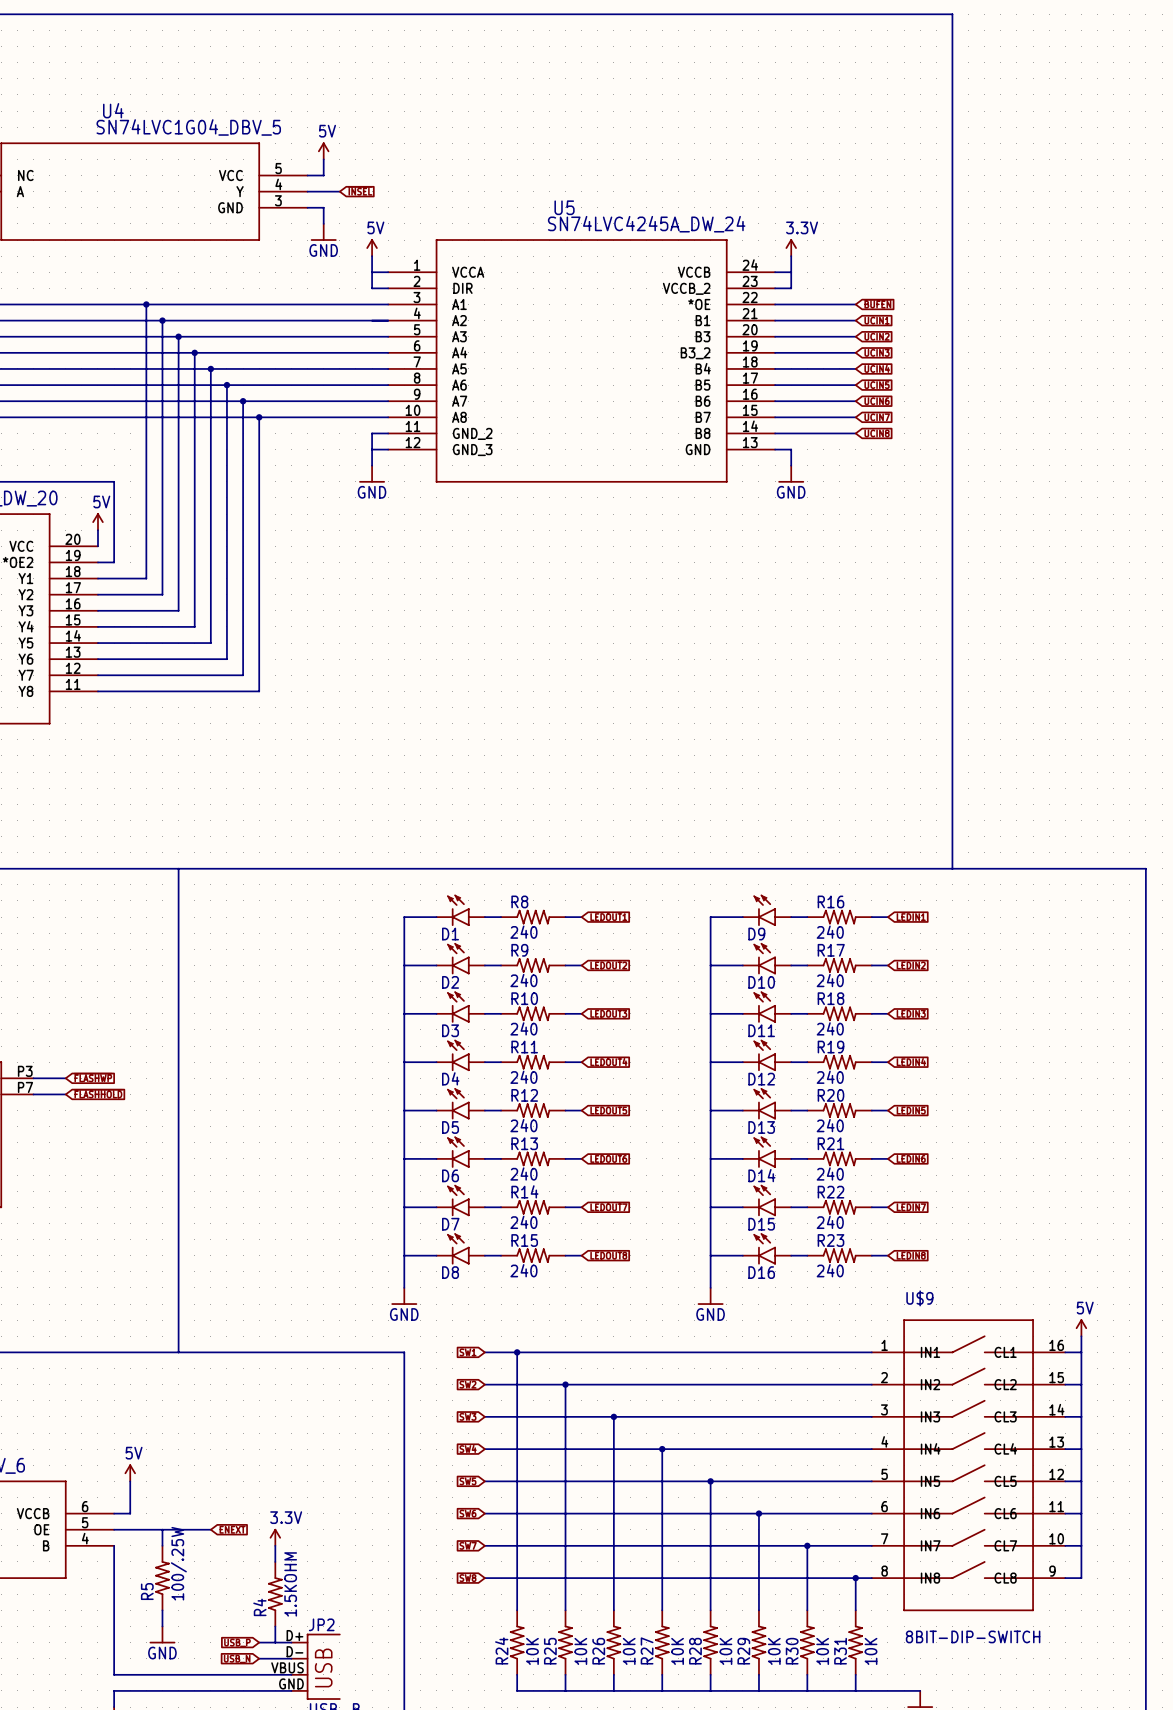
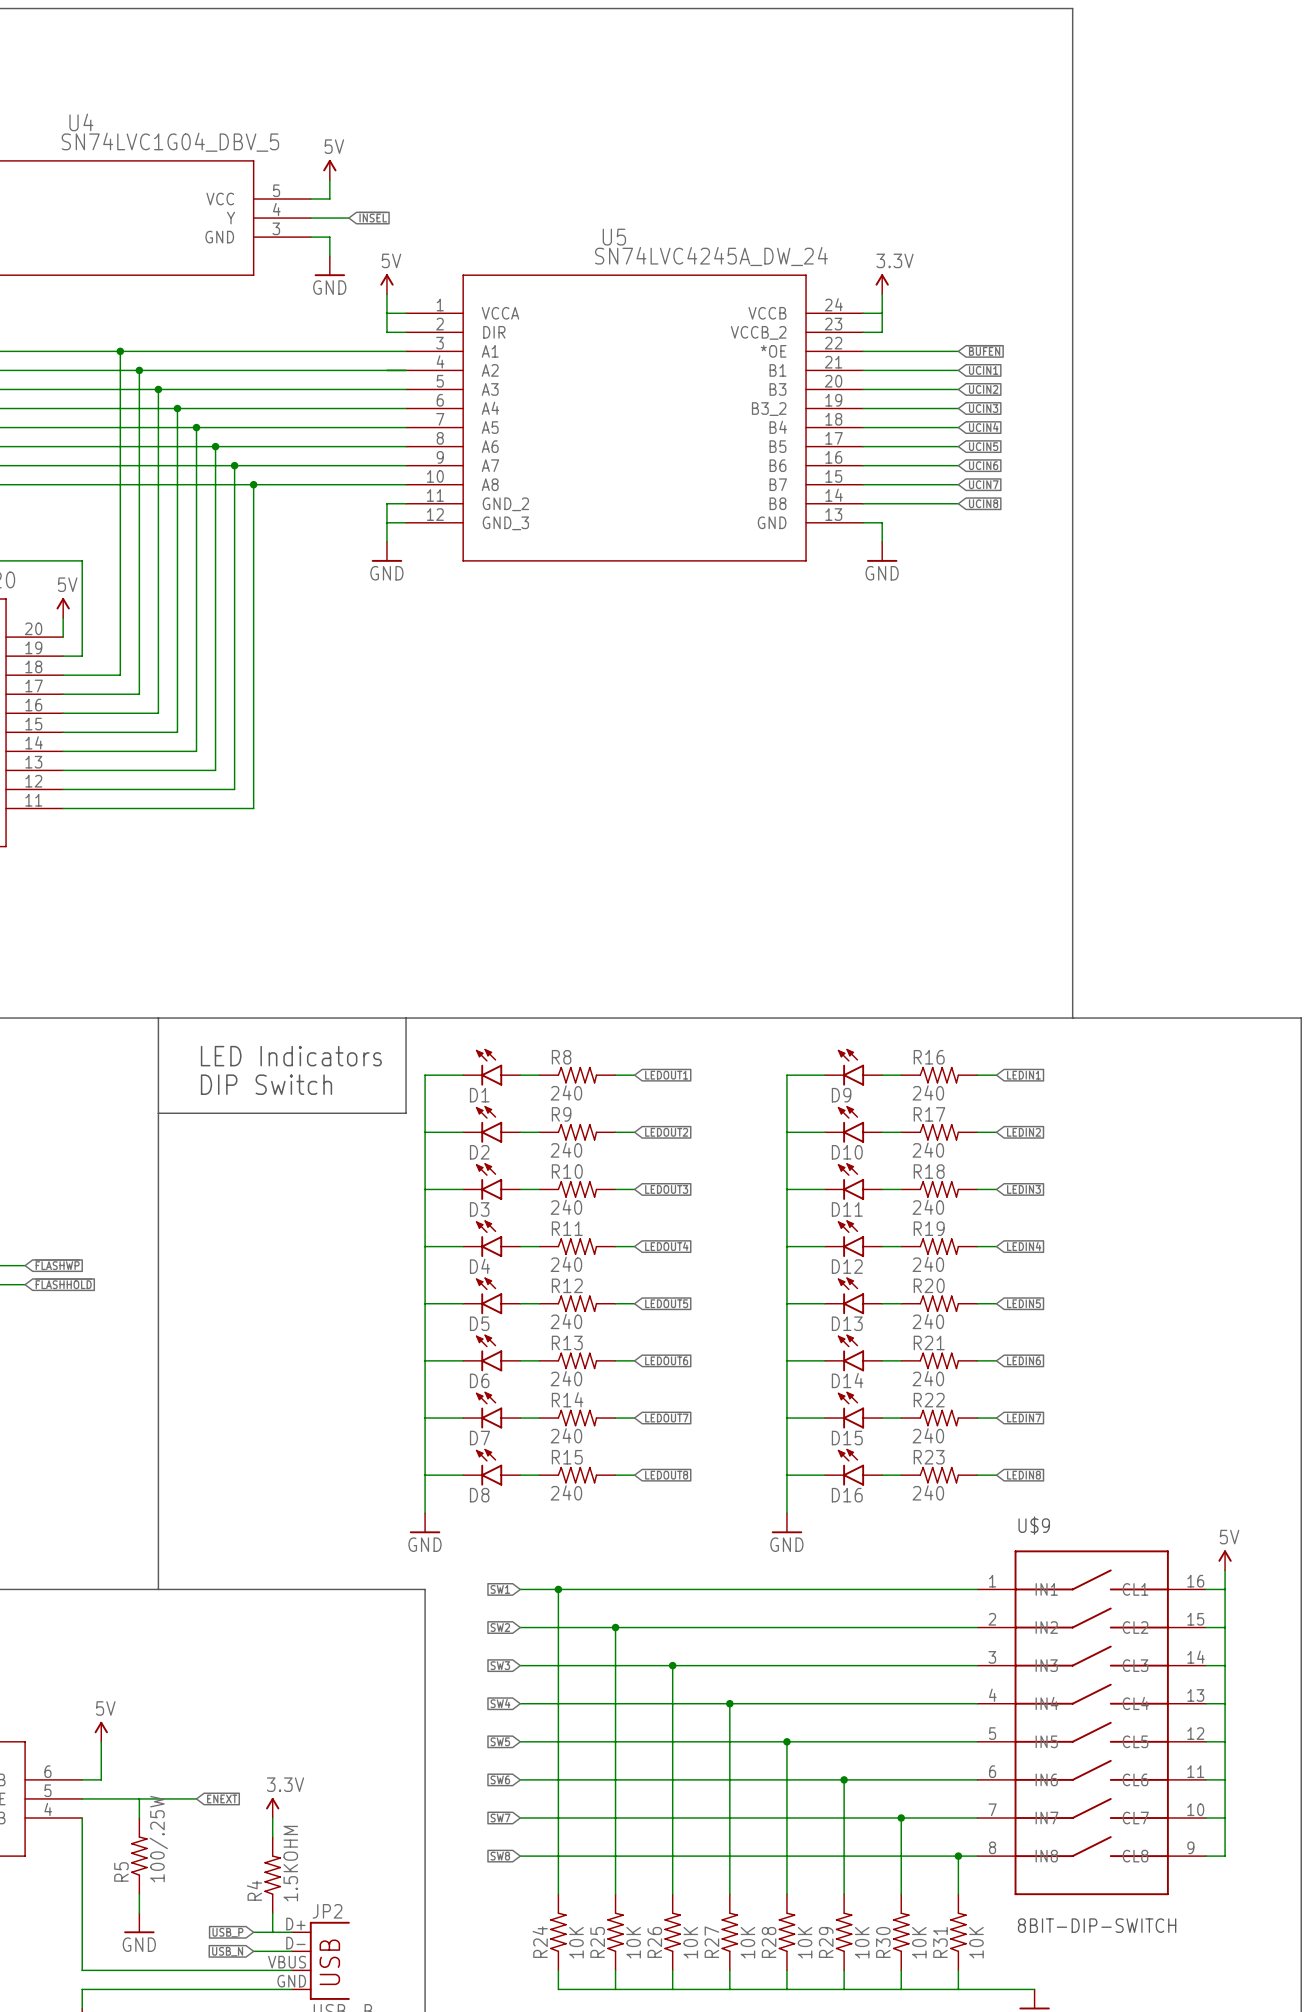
line: none -> (406, 1018) (406, 1113) (158, 1113)
text: none -> LED Indicators (291, 1056)
text: none -> DIP Switch (266, 1084)

